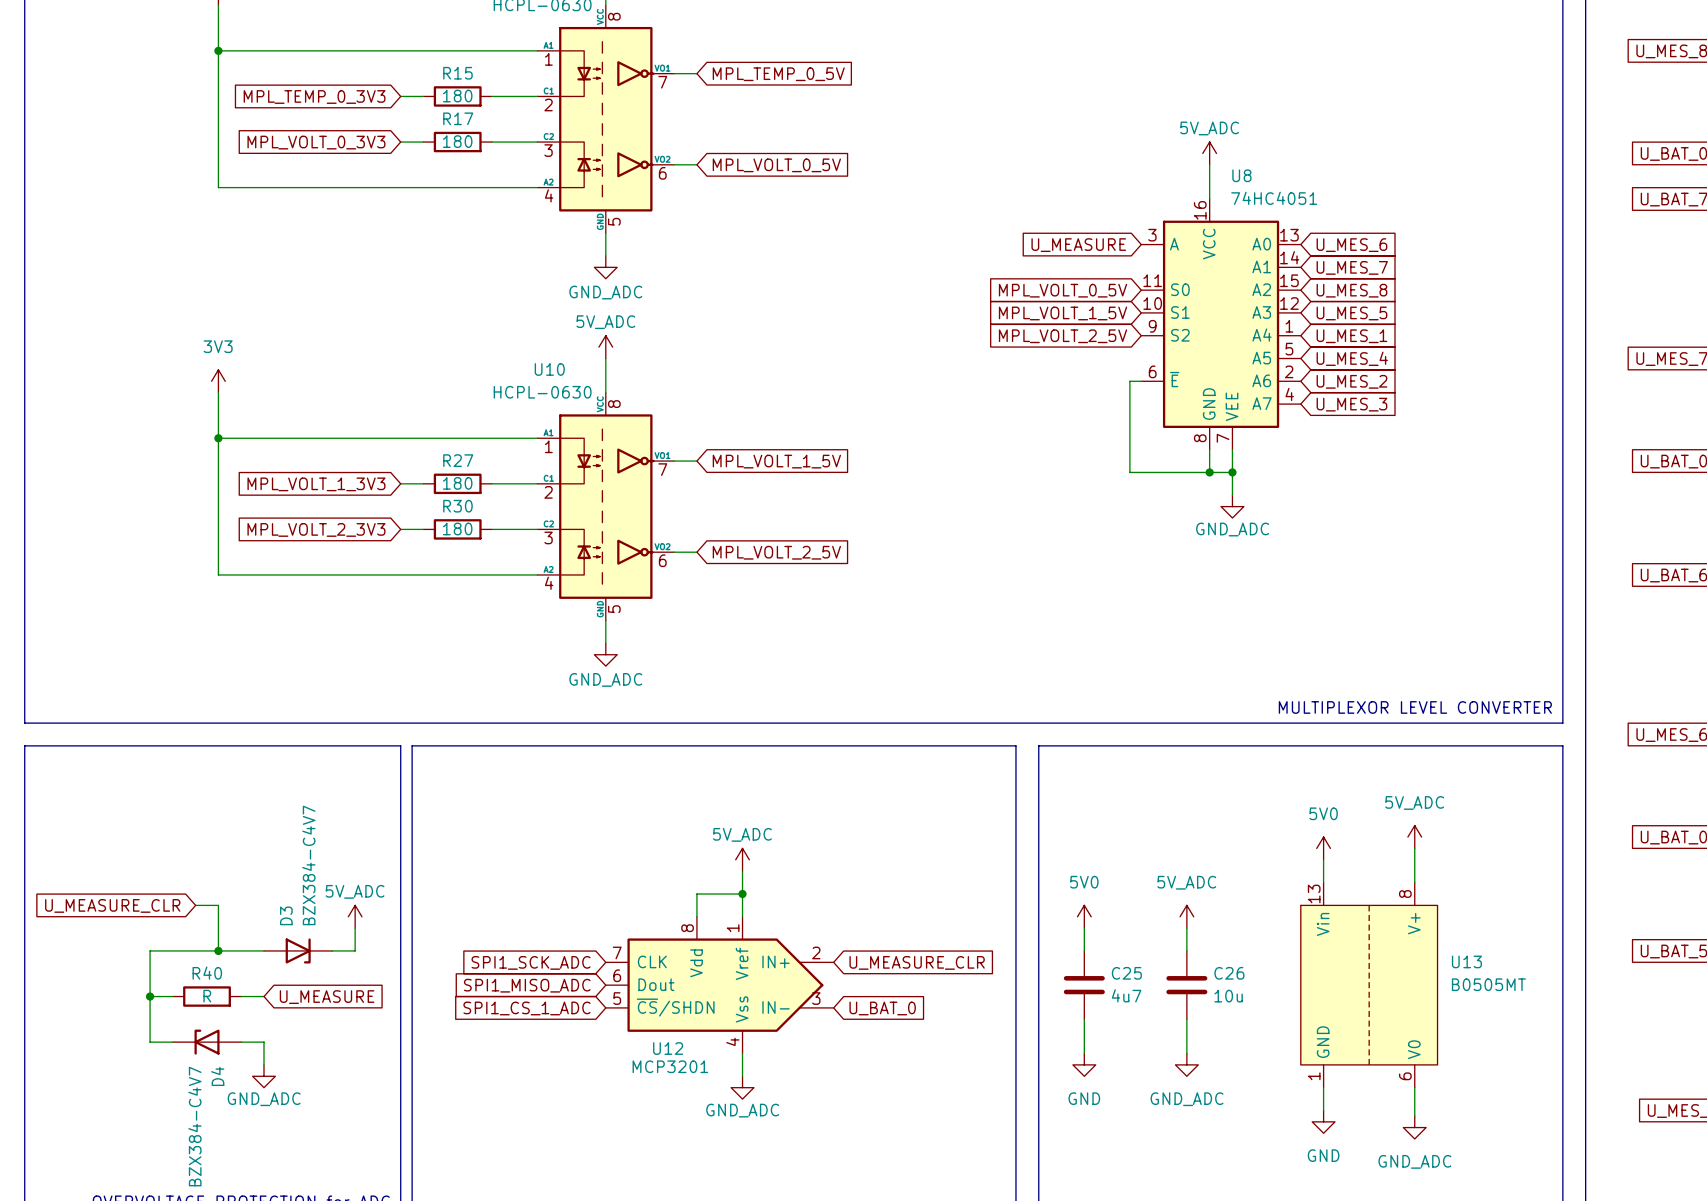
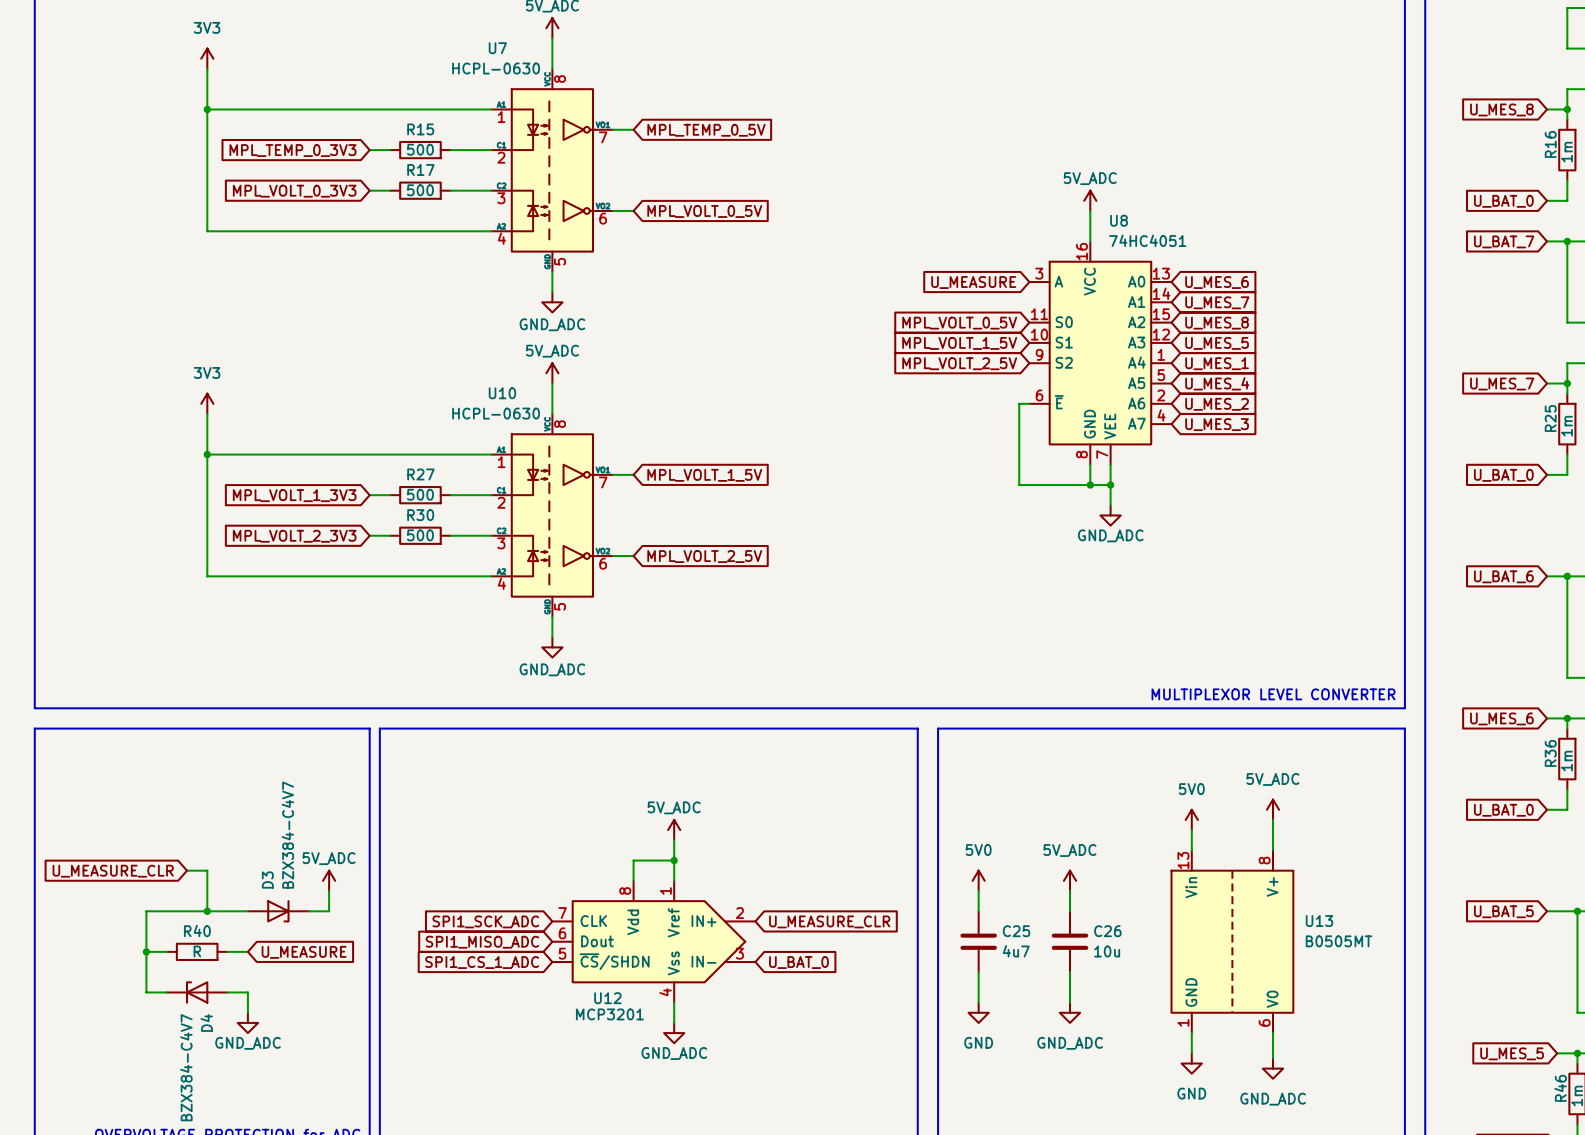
R15 value: 180 (457, 96) -> 500 (420, 149)
R17 value: 180 (457, 141) -> 500 (420, 190)
R27 value: 180 (457, 483) -> 500 (420, 494)
R30 value: 180 (457, 528) -> 500 (420, 535)

